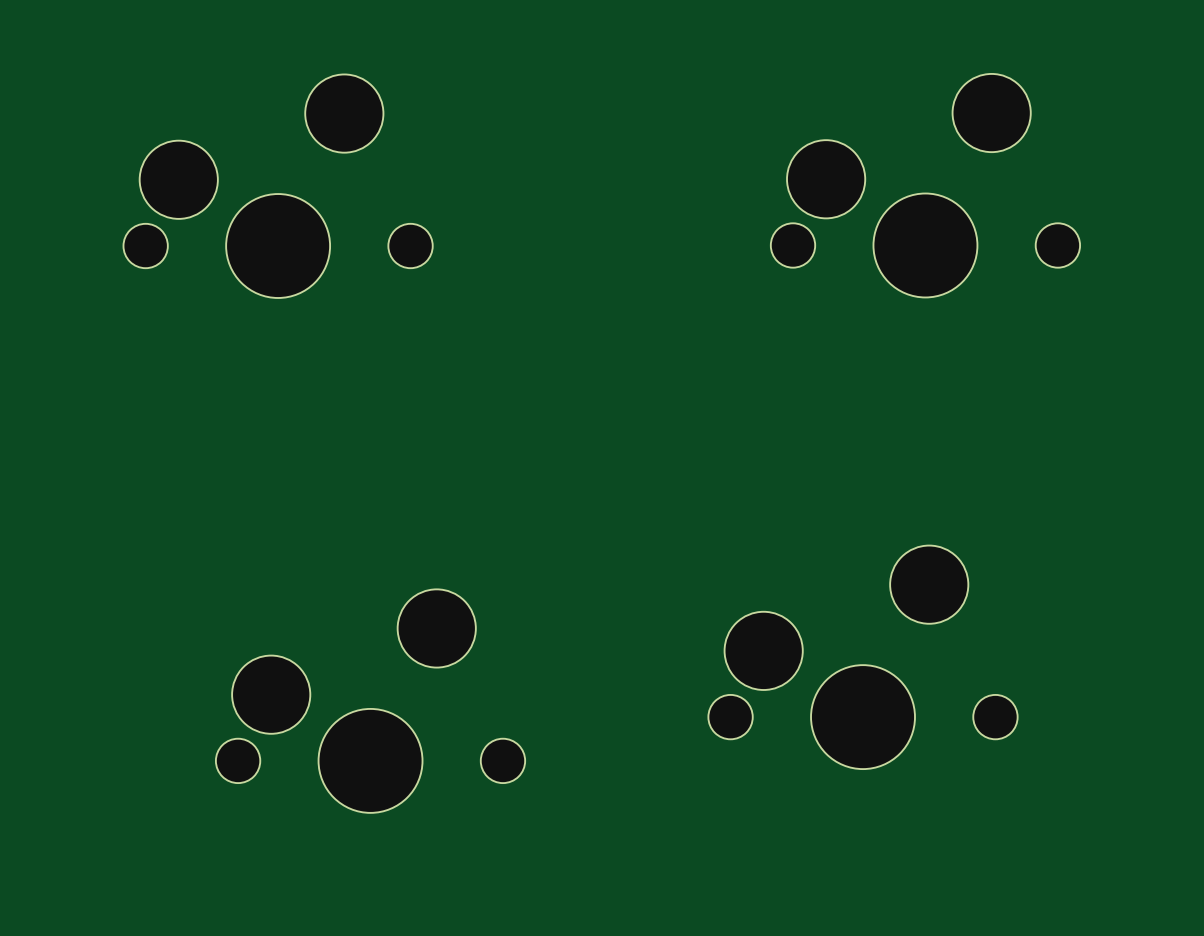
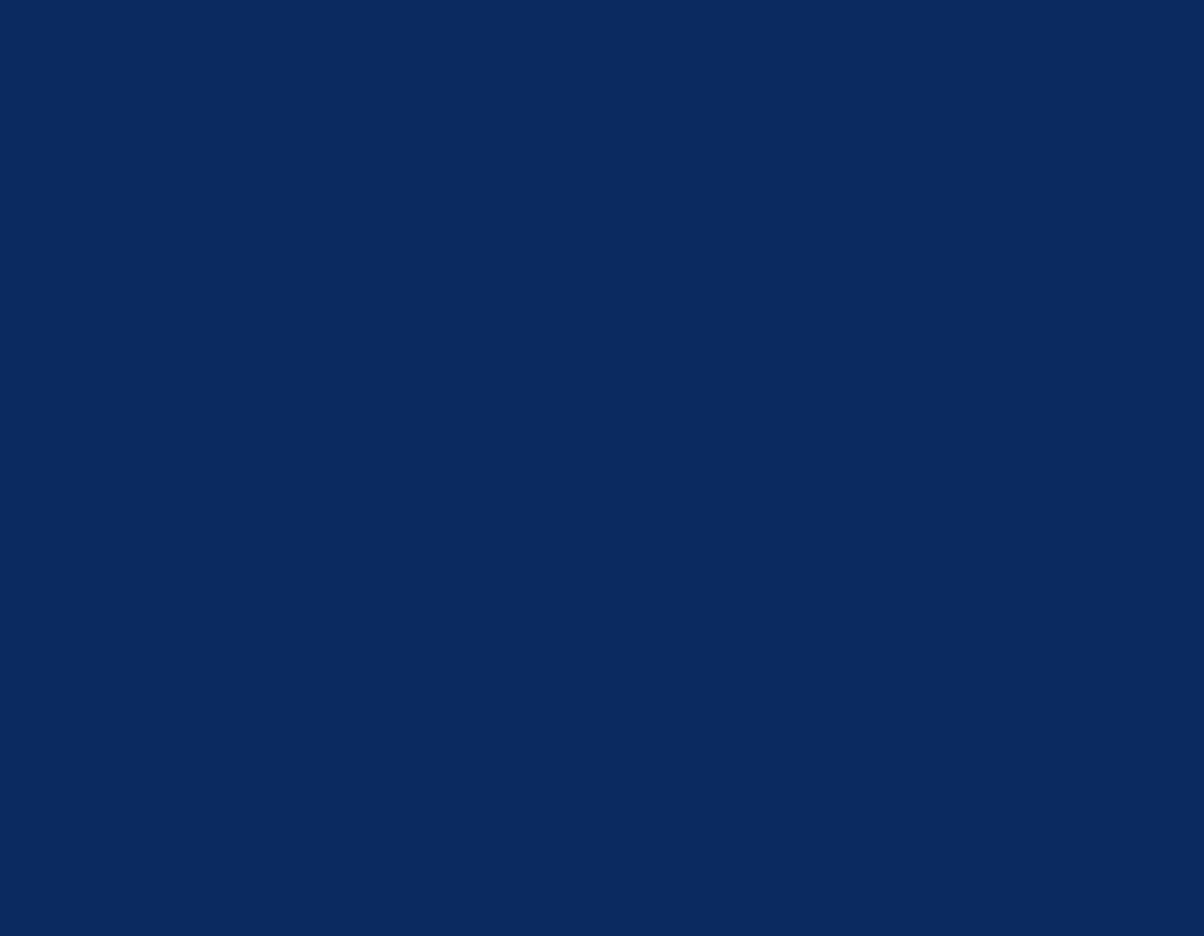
part: (925, 185) -> none
part: (278, 186) -> none
part: (863, 657) -> none
part: (370, 701) -> none

